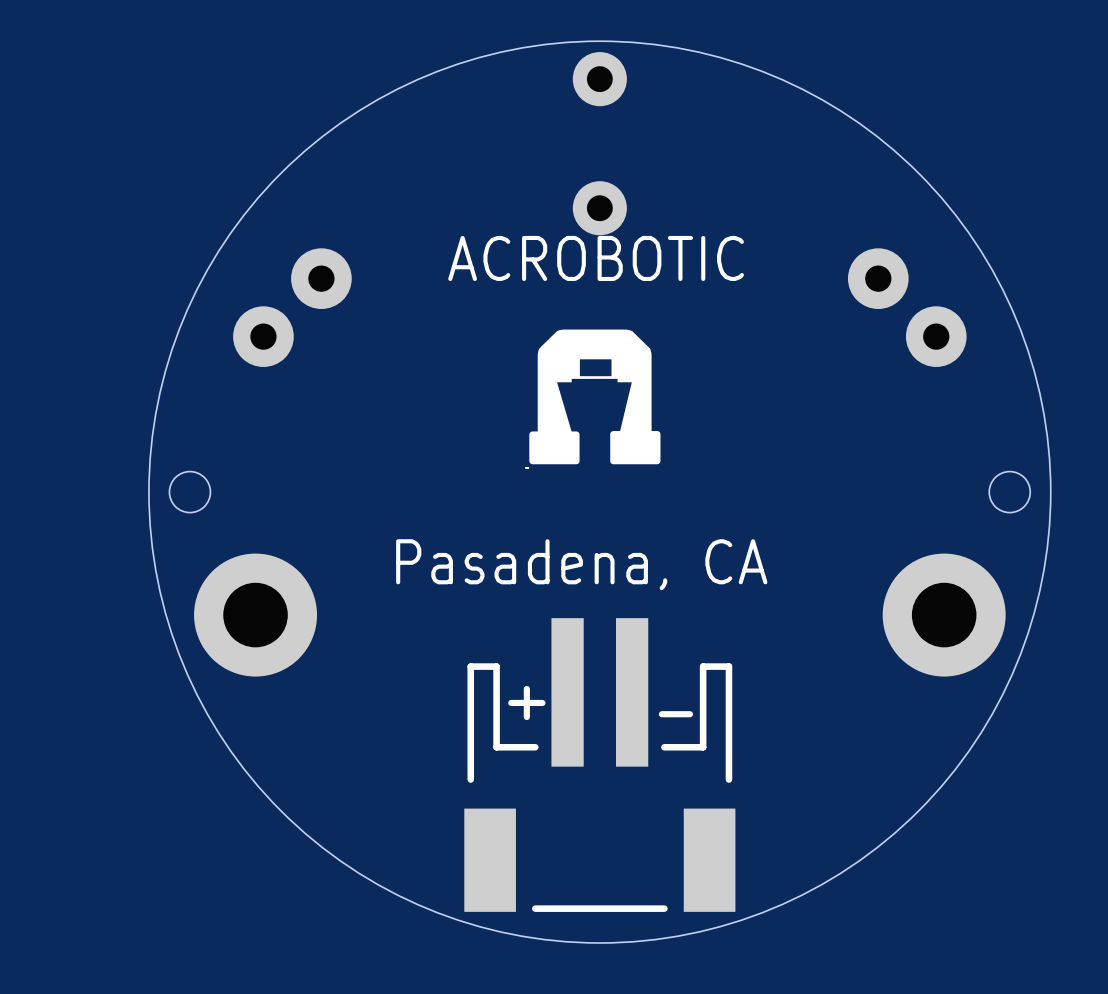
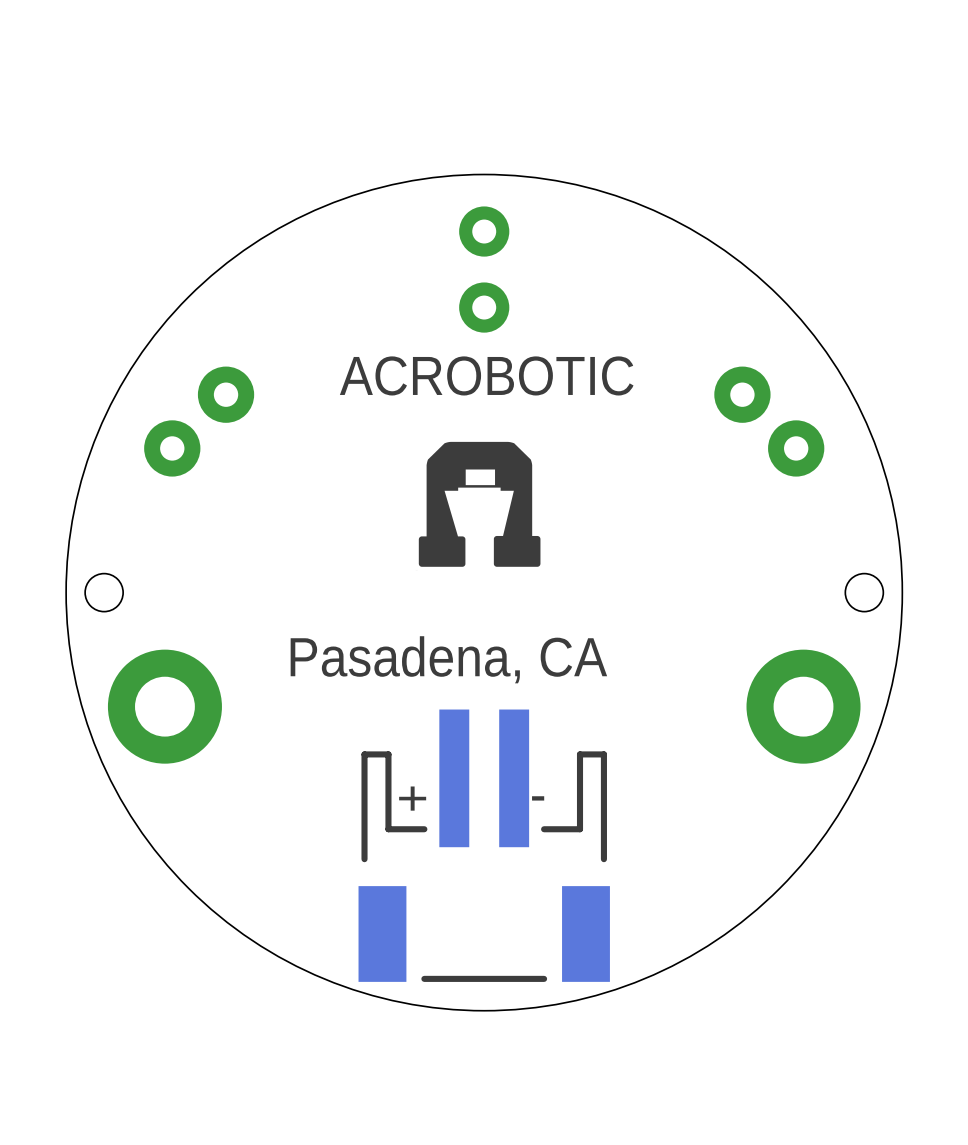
part footprint: [572, 52, 627, 236] -> [459, 206, 510, 333]

